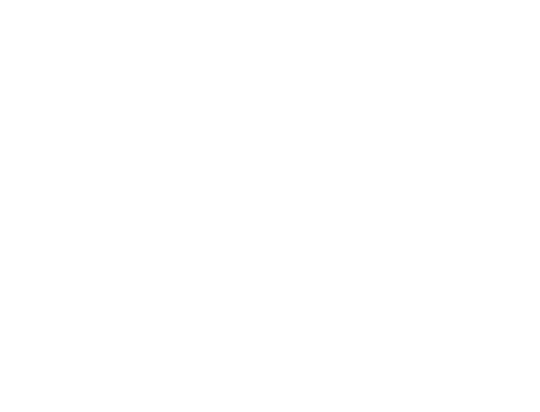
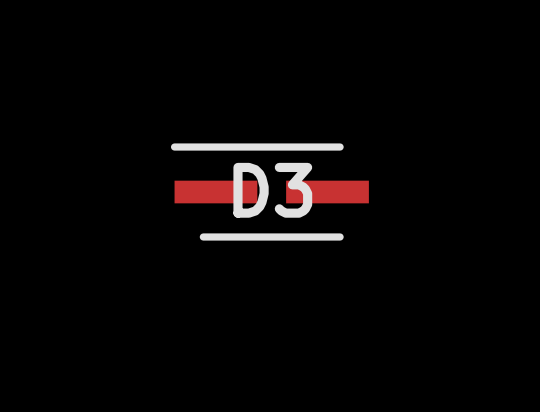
D3: none -> (269, 192)

